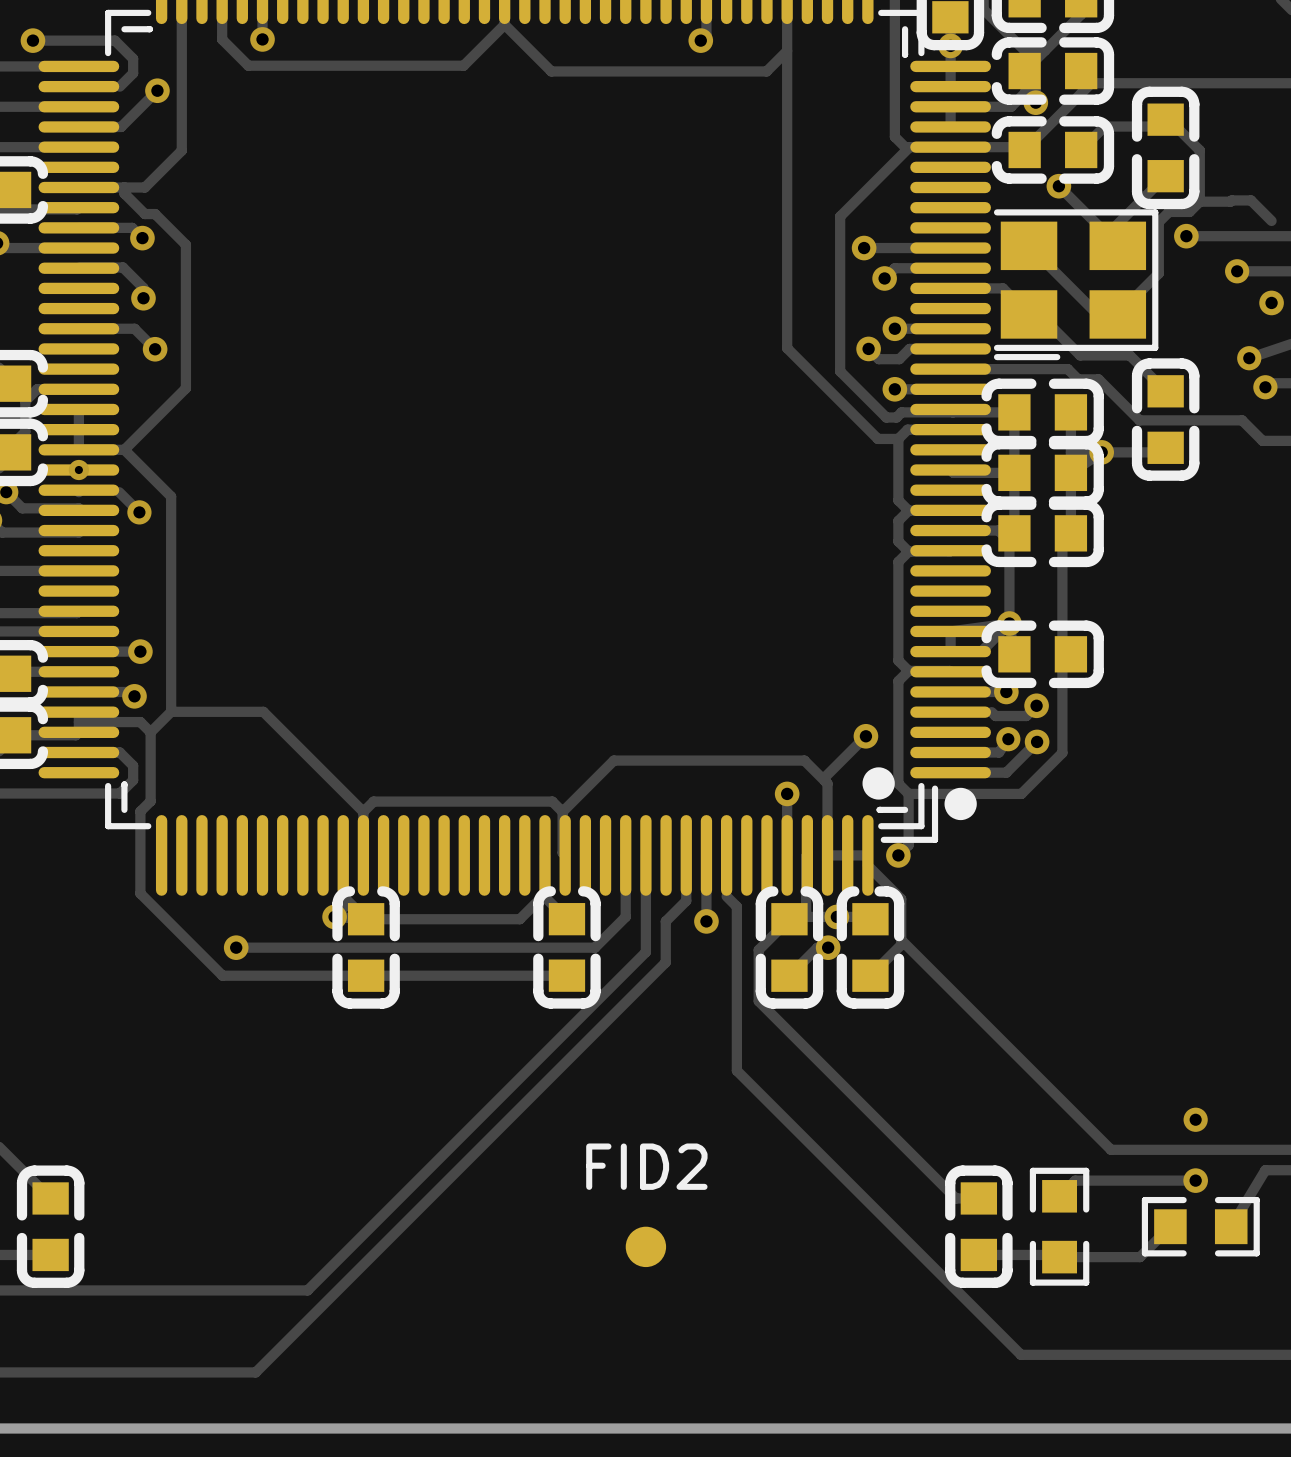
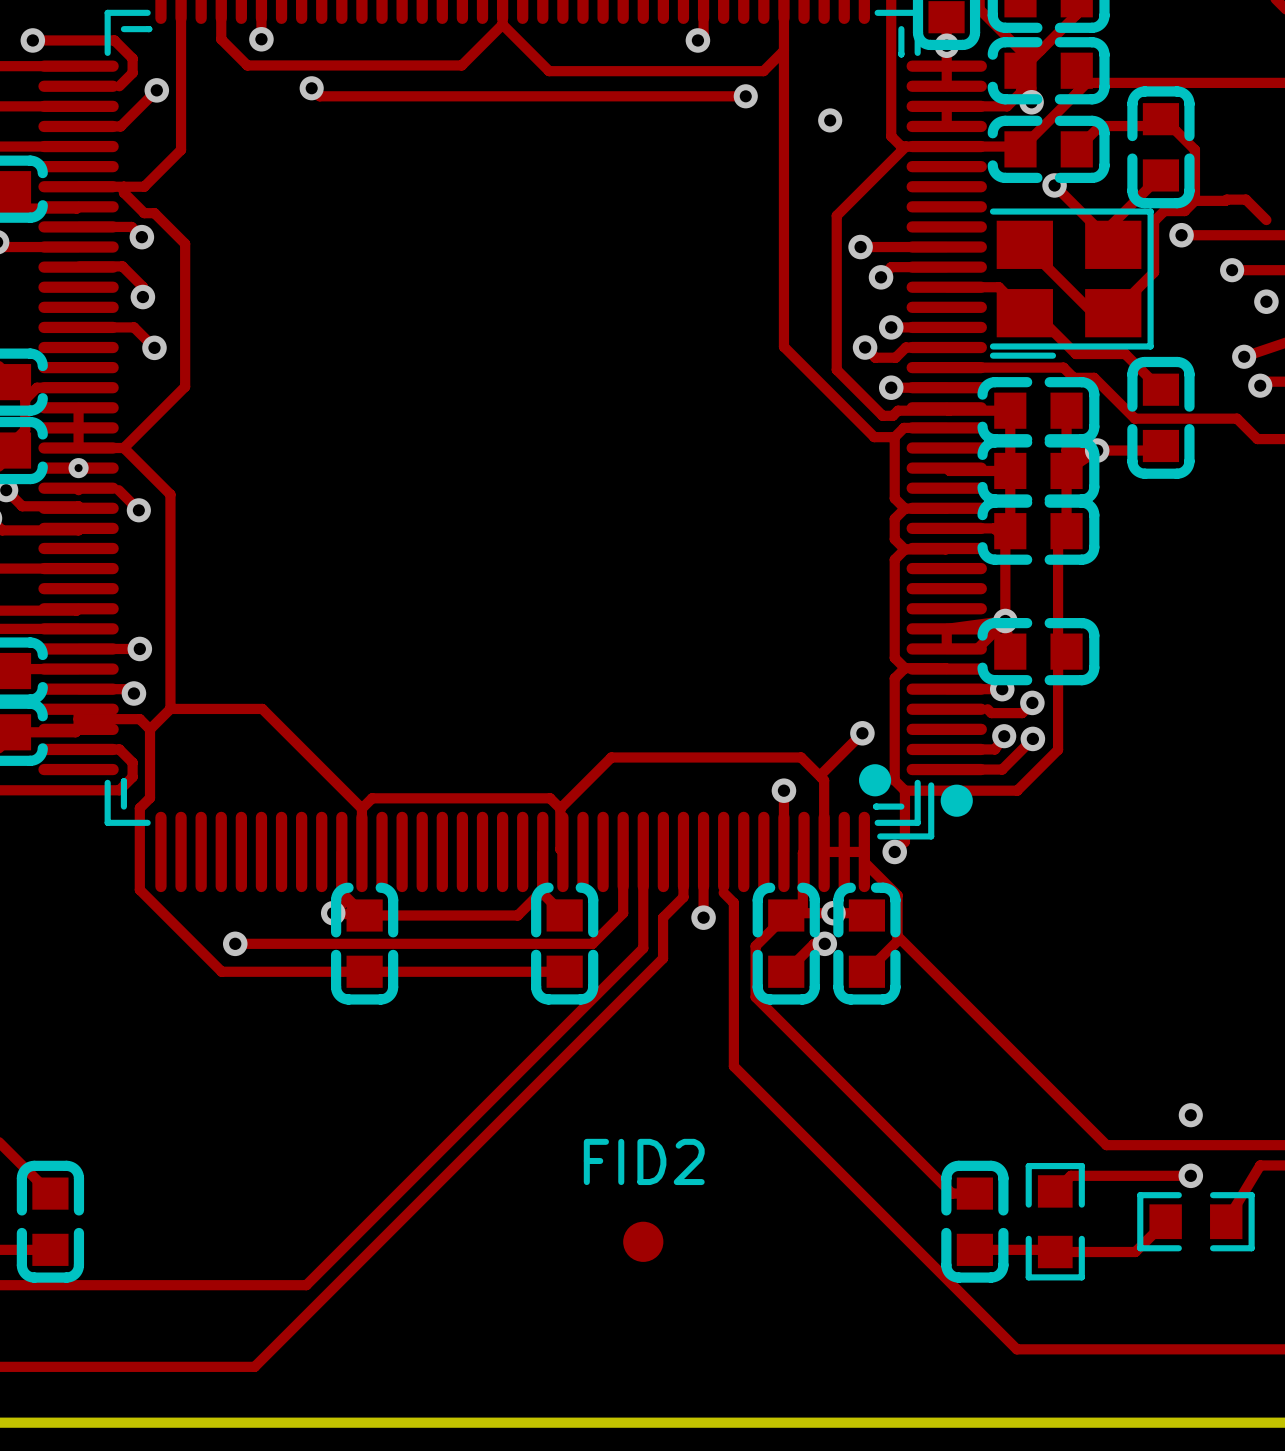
track: none -> (311, 88) (319, 96) (745, 96)
via: none -> (311, 88)
via: none -> (745, 96)
via: none -> (830, 120)

